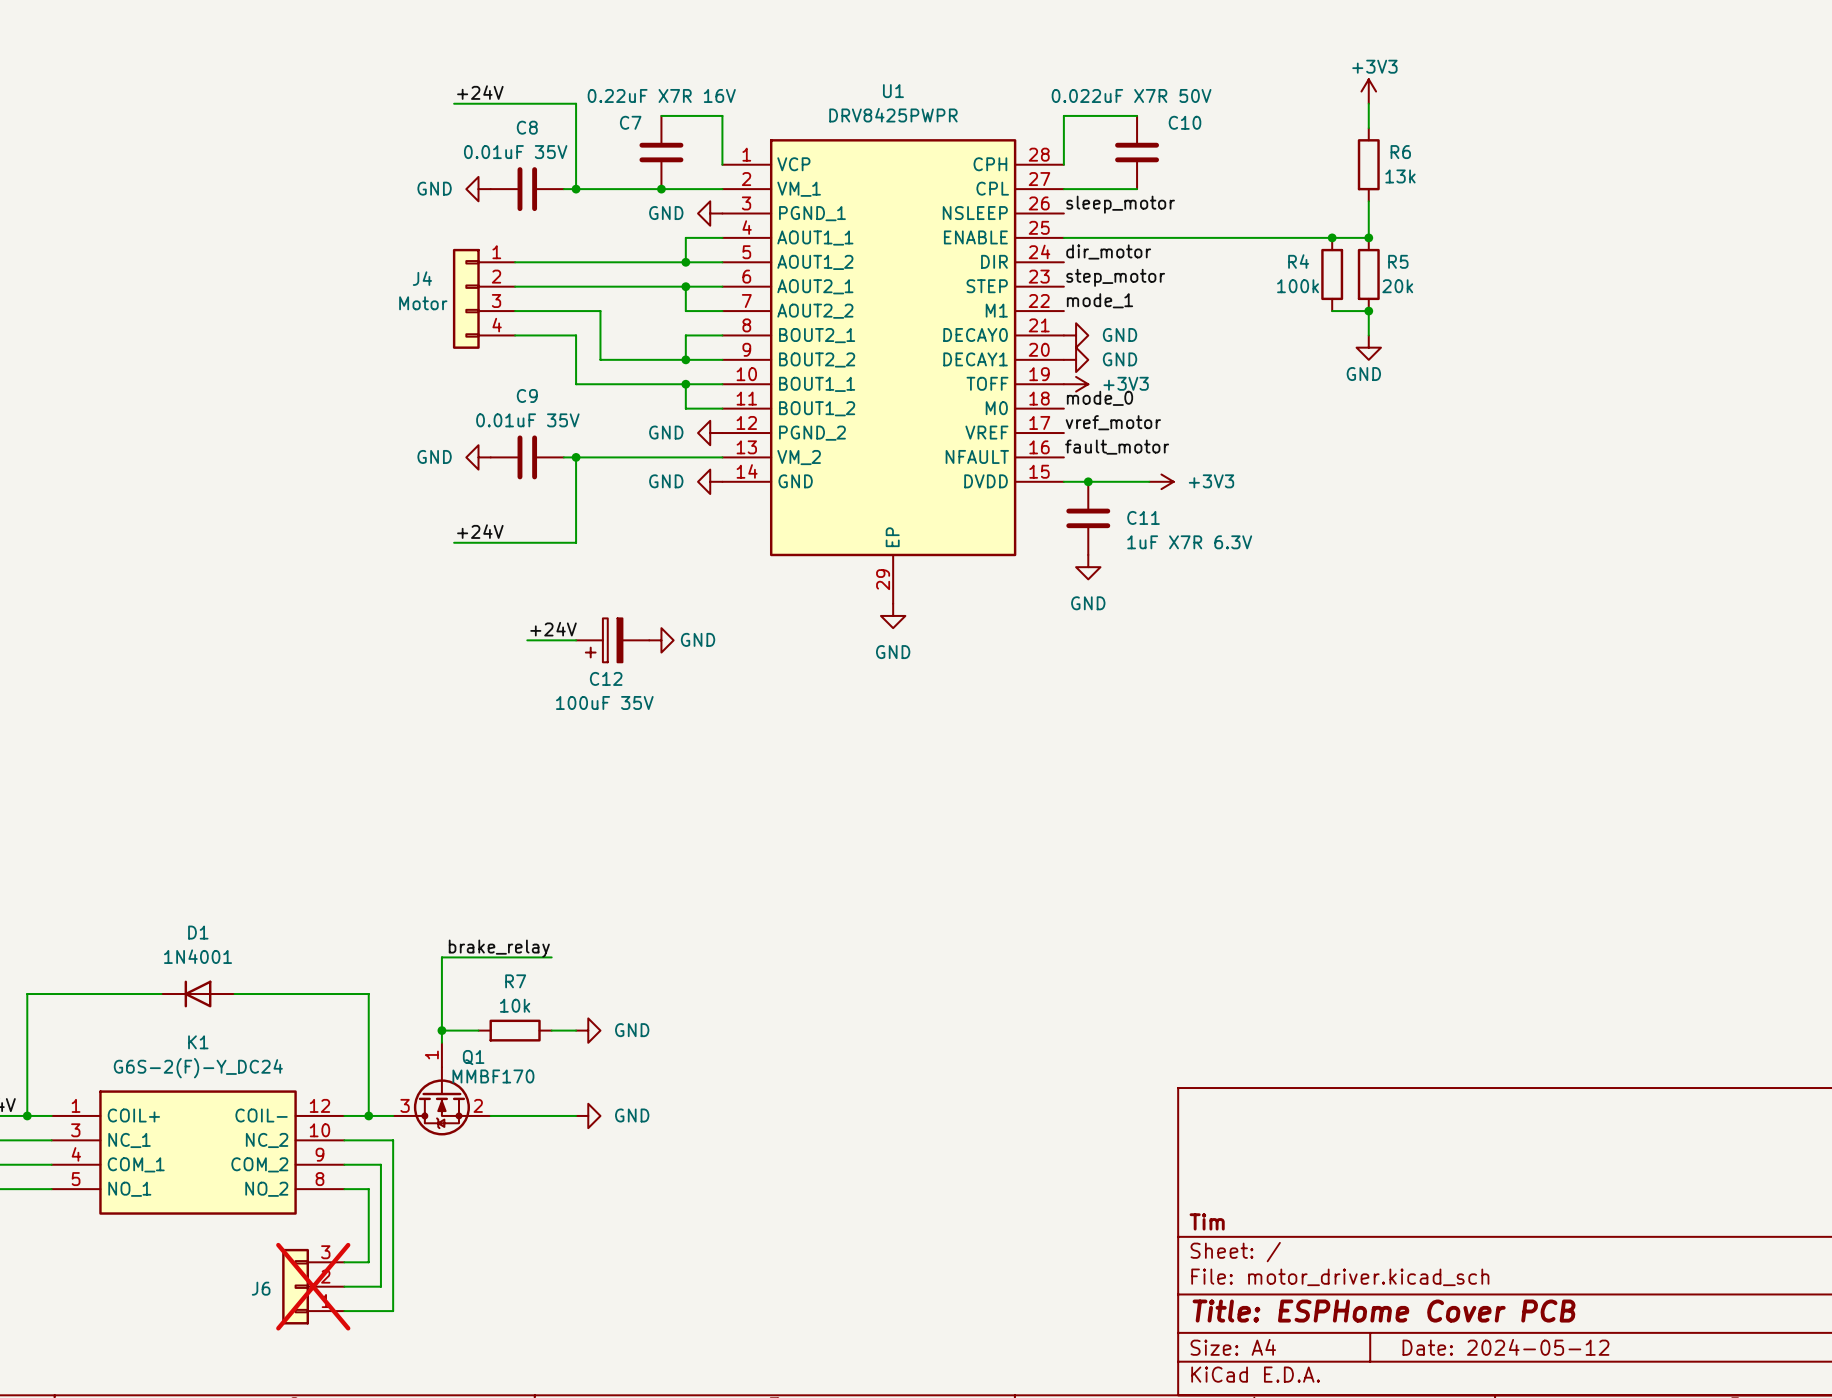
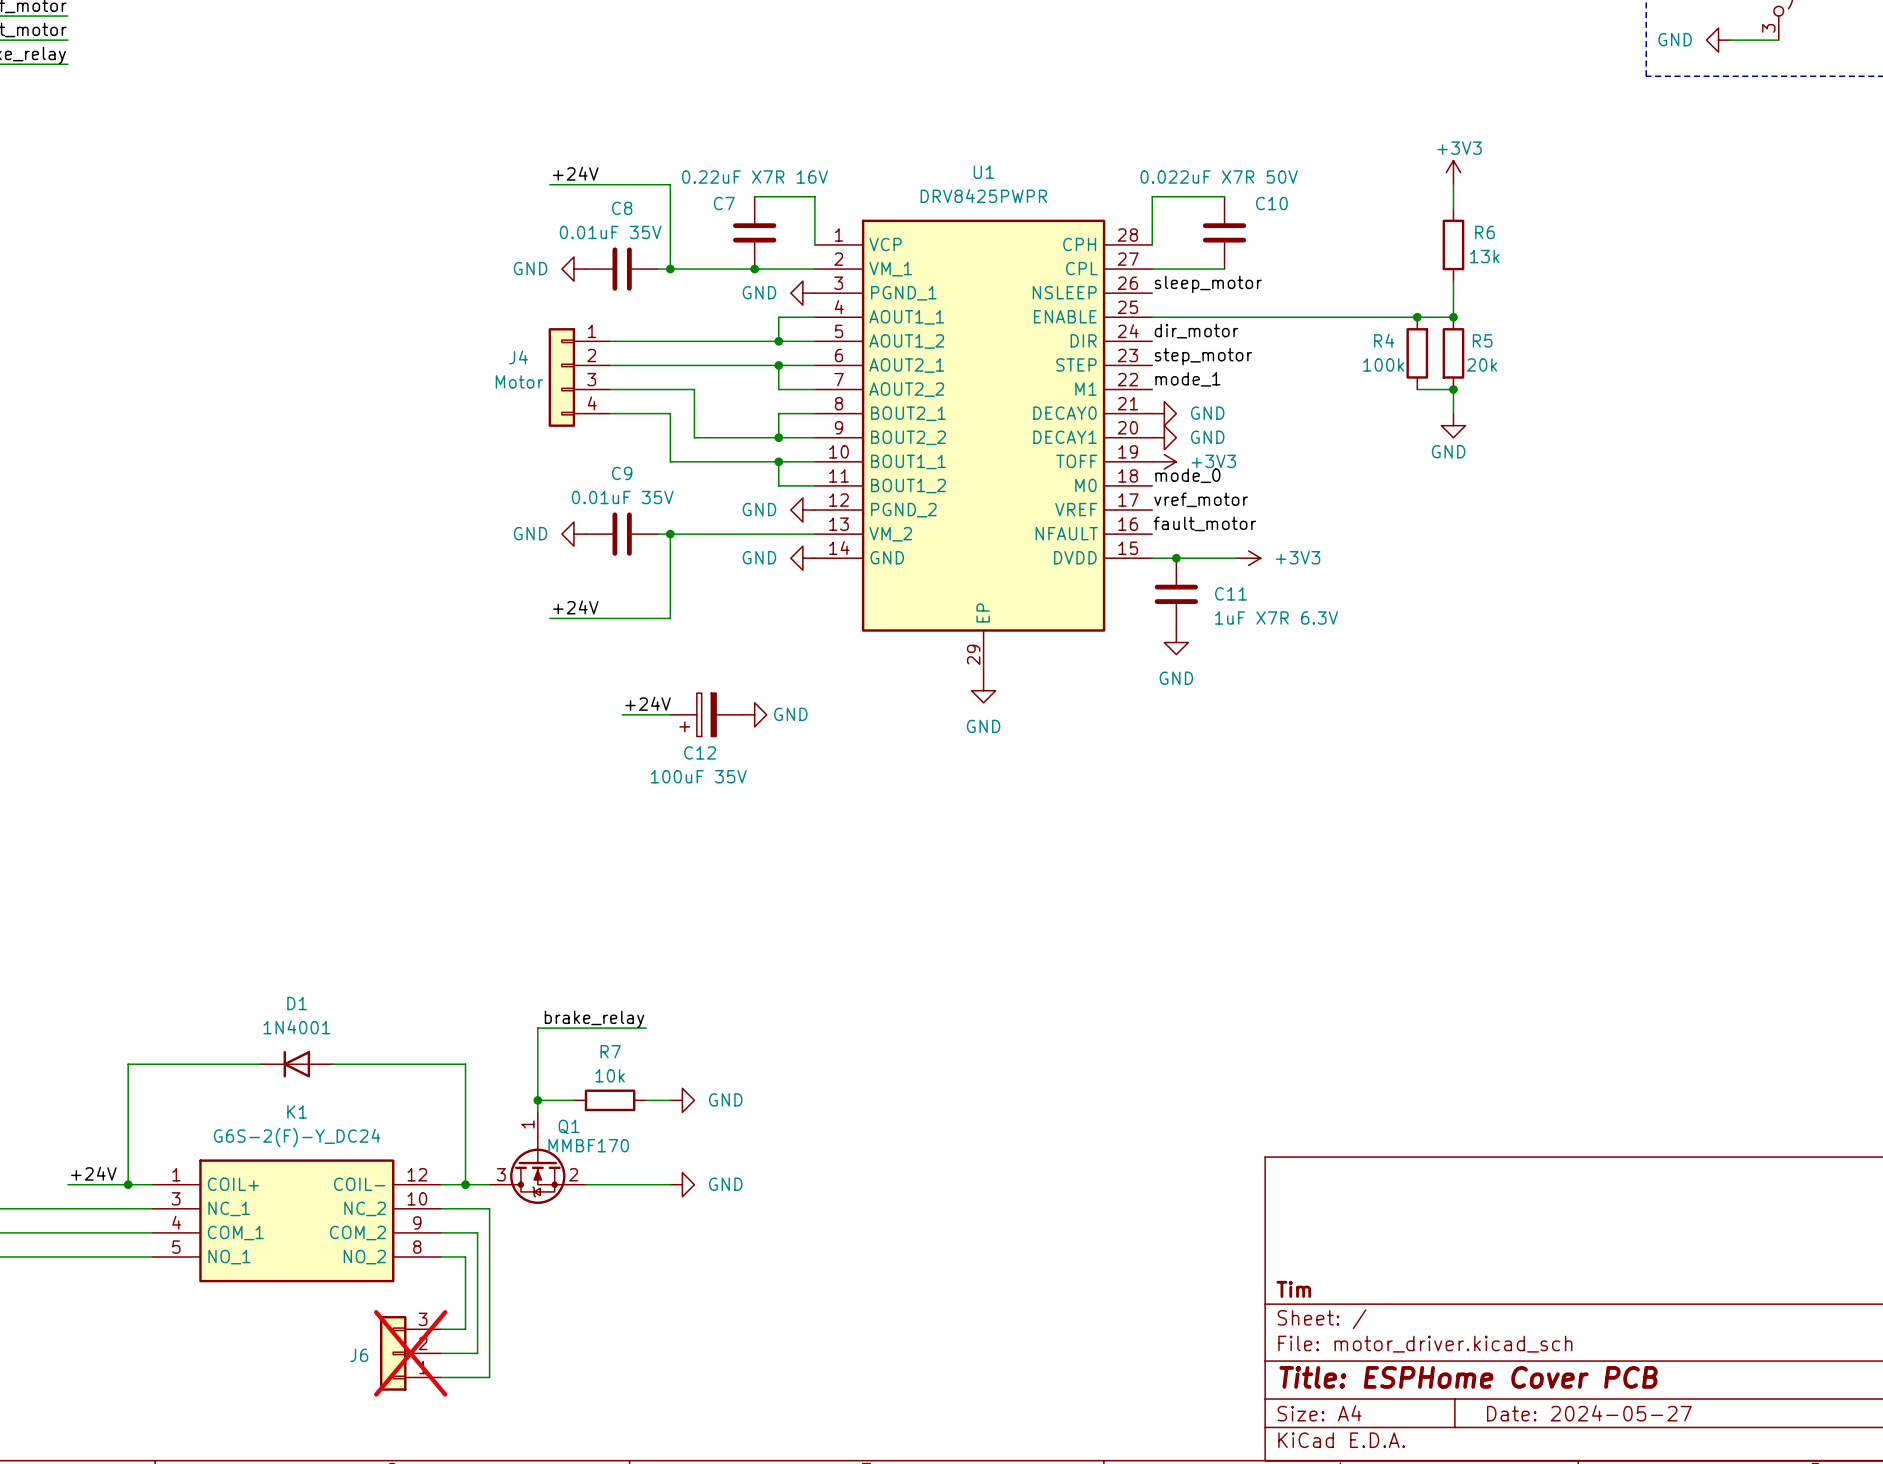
title block: Date: 2024-05-12 (1505, 1347) -> Date: 2024-05-27 (1589, 1413)

